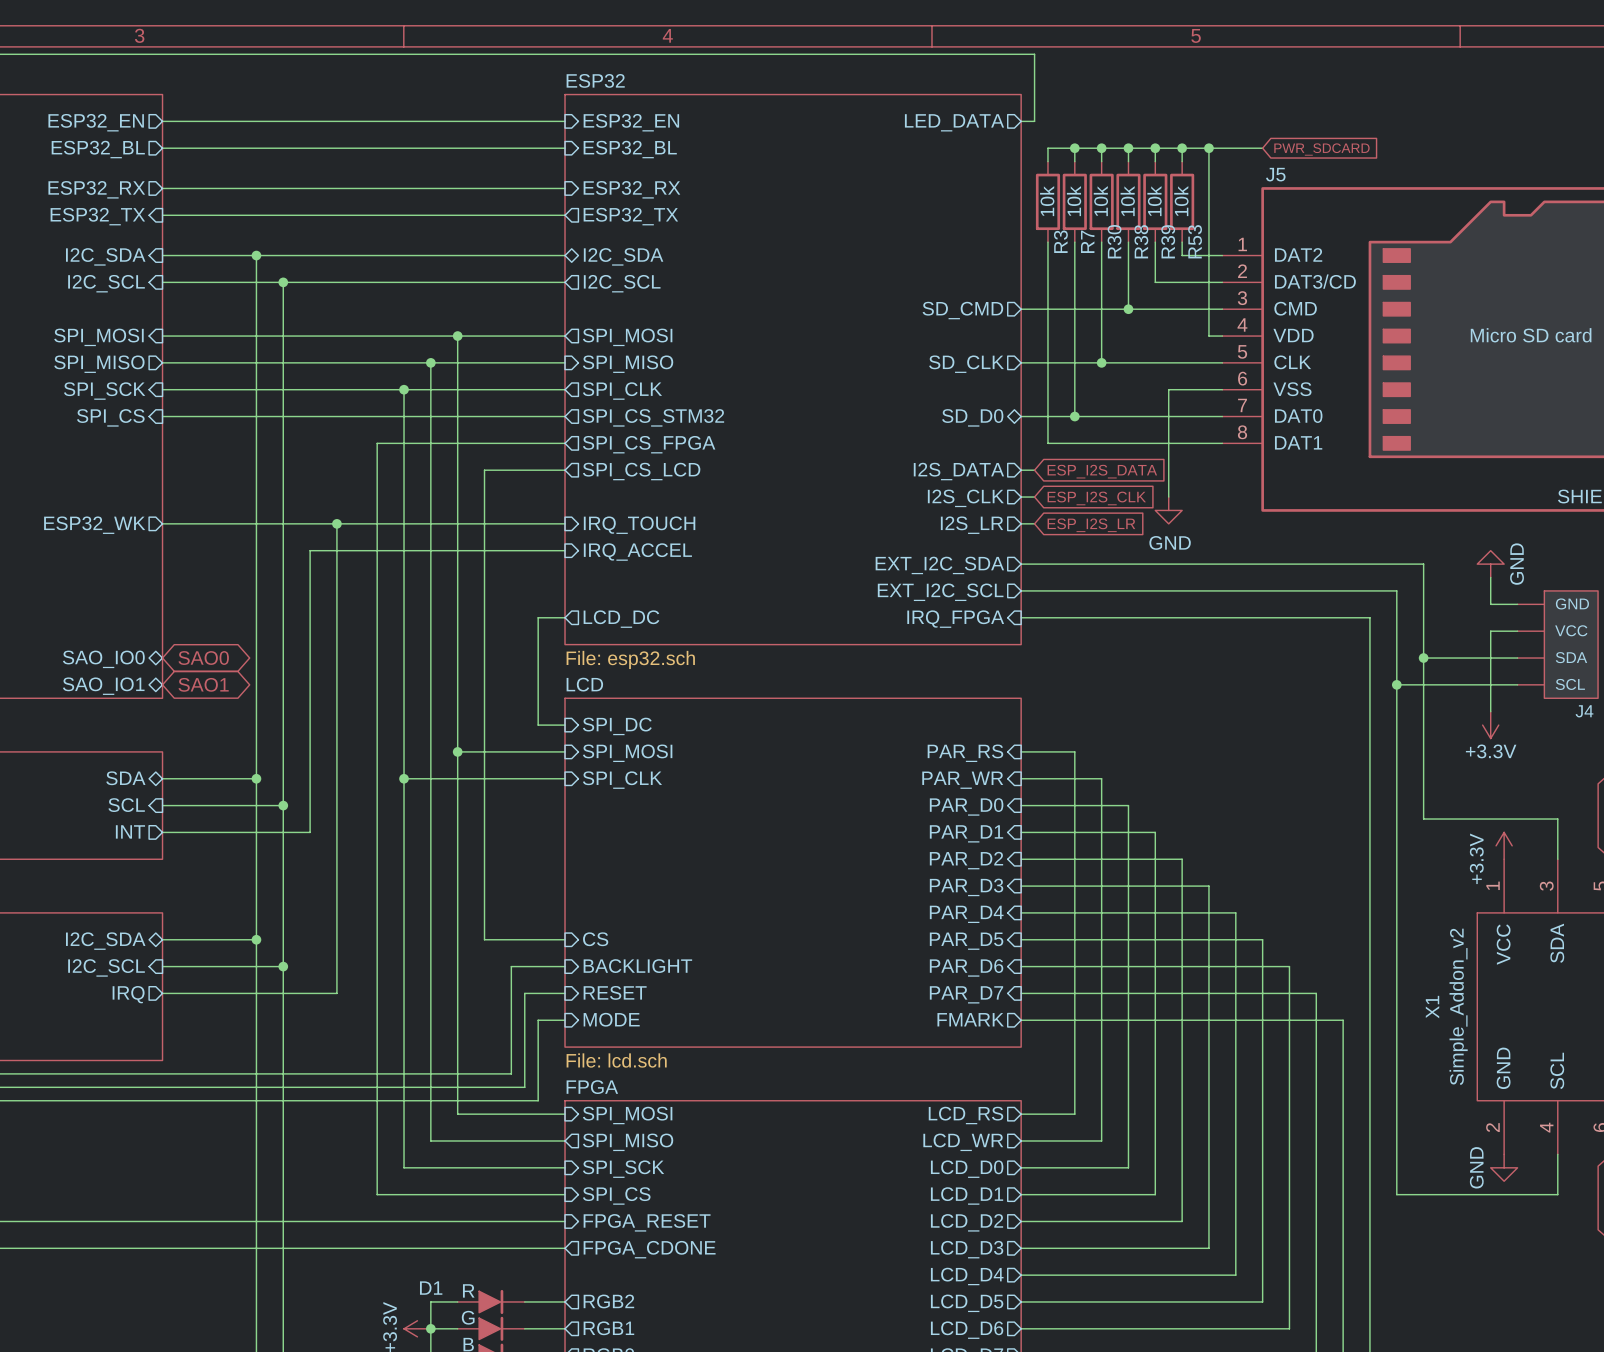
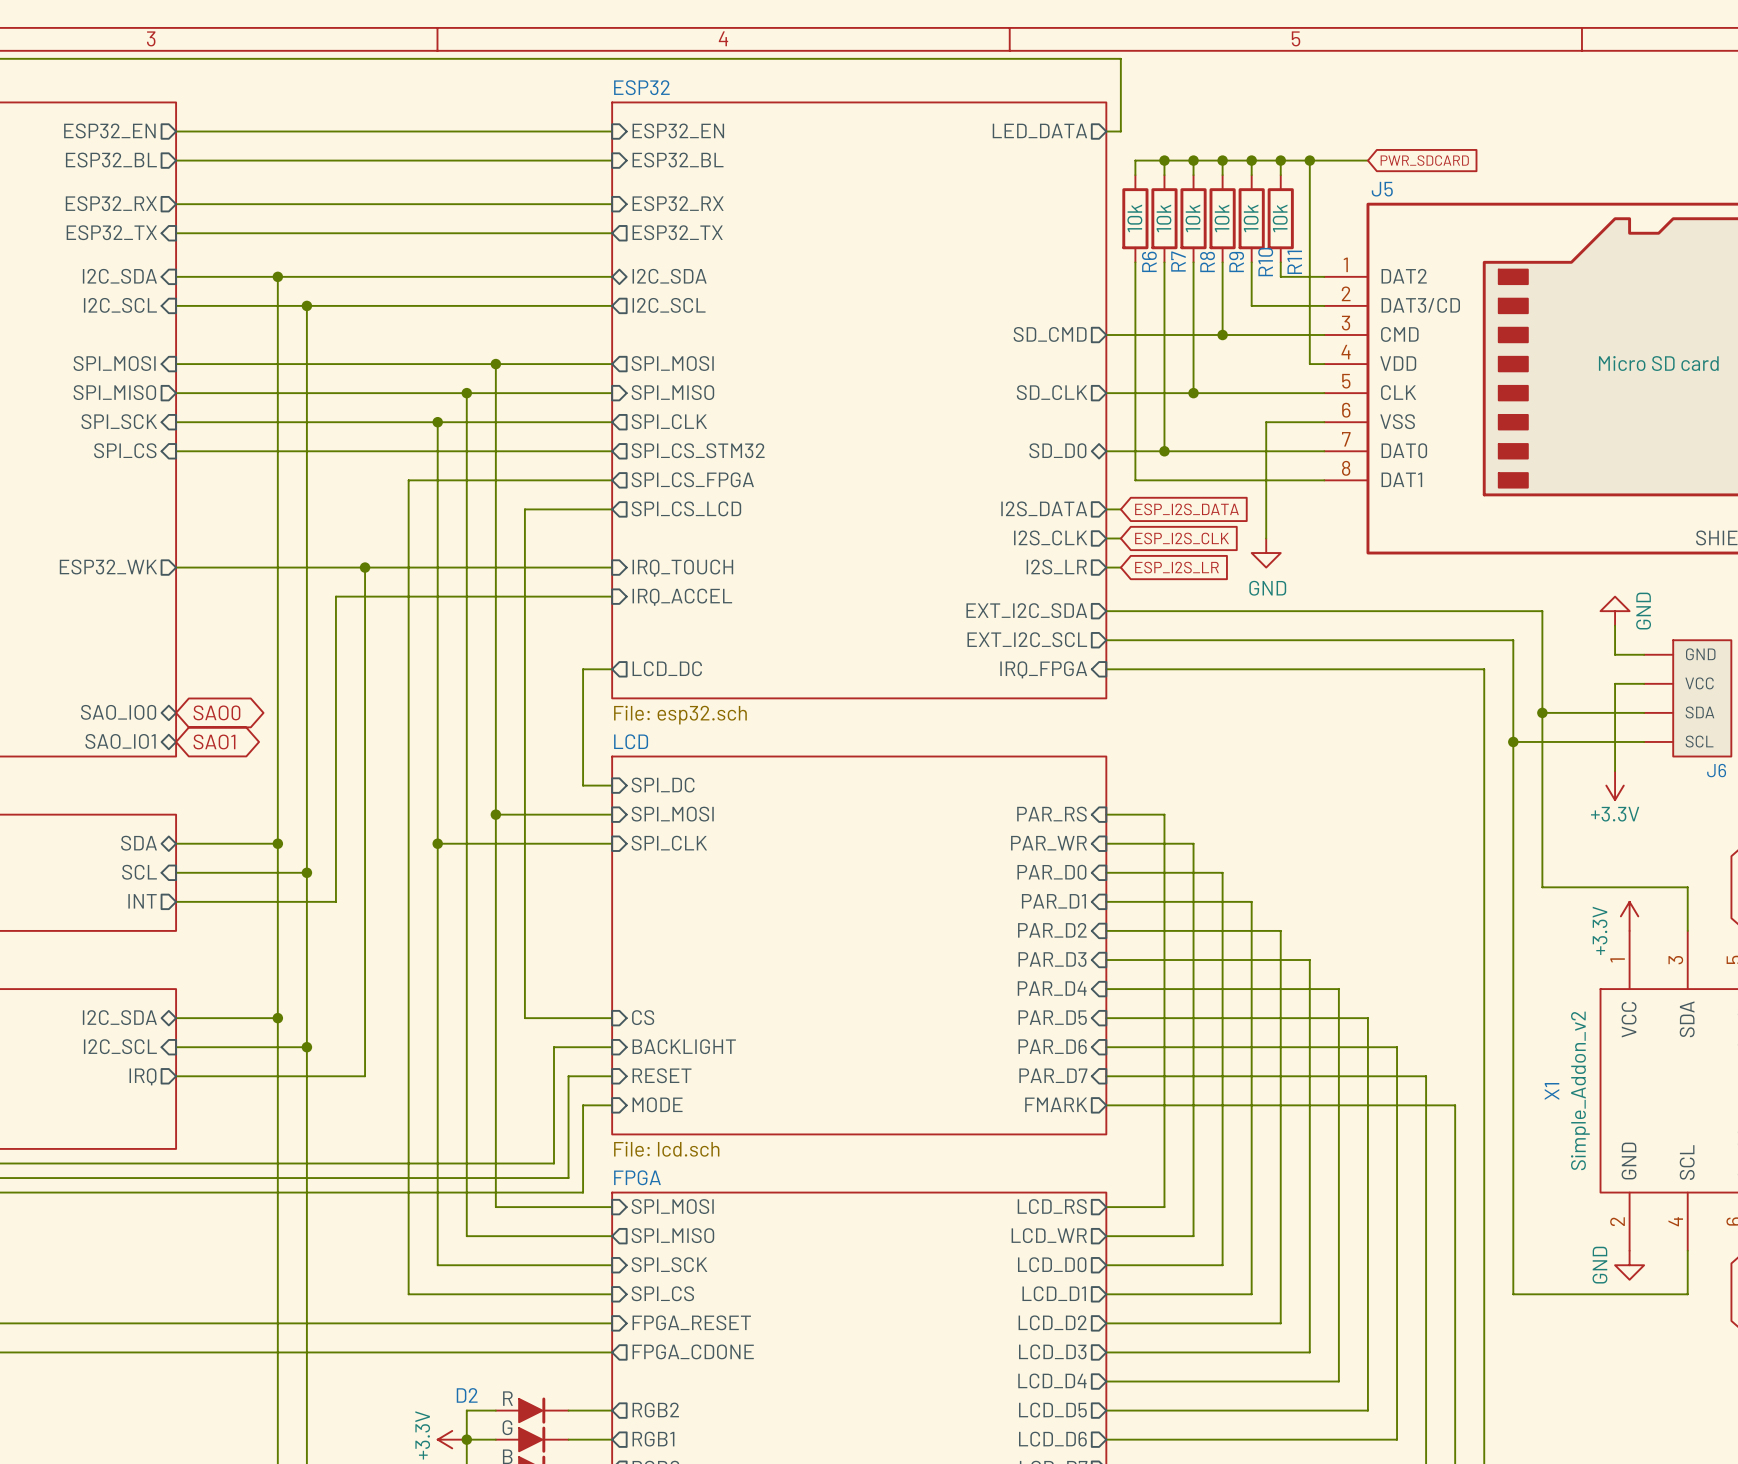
R3 name: R3 (1060, 241) -> R6 (1149, 261)
R30 name: R30 (1114, 241) -> R8 (1207, 261)
R38 name: R38 (1141, 241) -> R9 (1236, 262)
R39 name: R39 (1168, 241) -> R10 (1265, 262)
R53 name: R53 (1195, 241) -> R11 (1294, 262)
J4 name: J4 (1584, 711) -> J6 (1716, 770)
D1 name: D1 (431, 1288) -> D2 (467, 1395)

